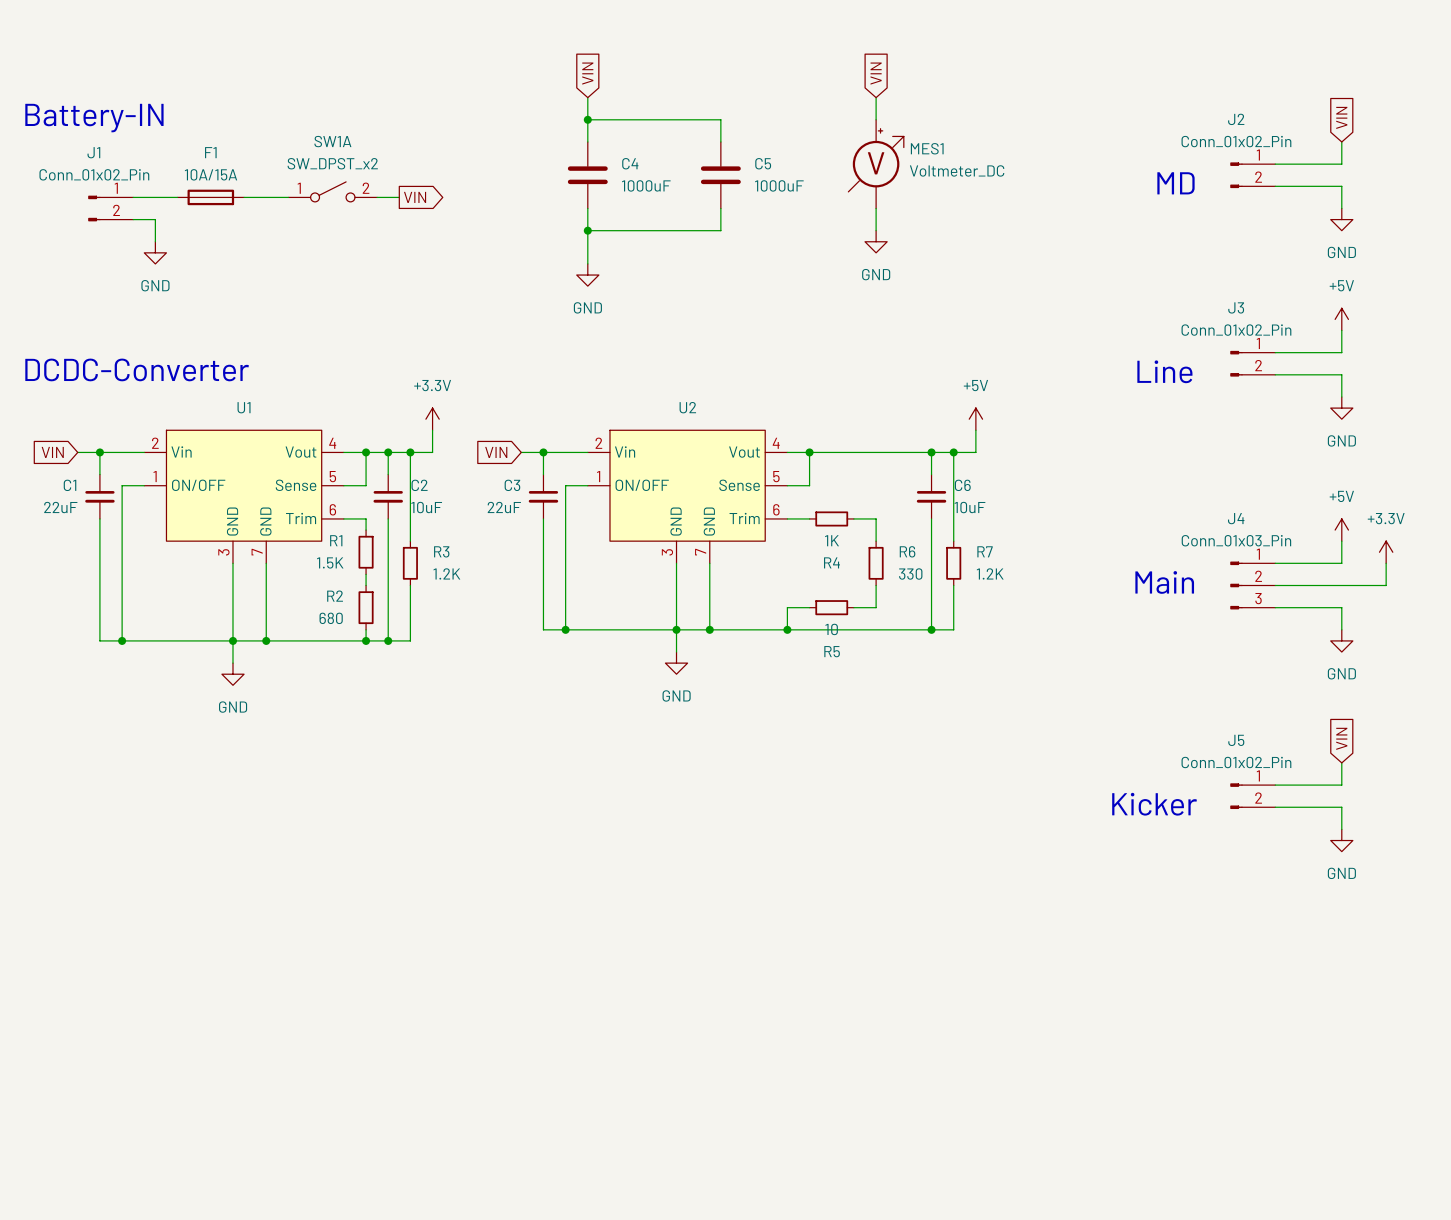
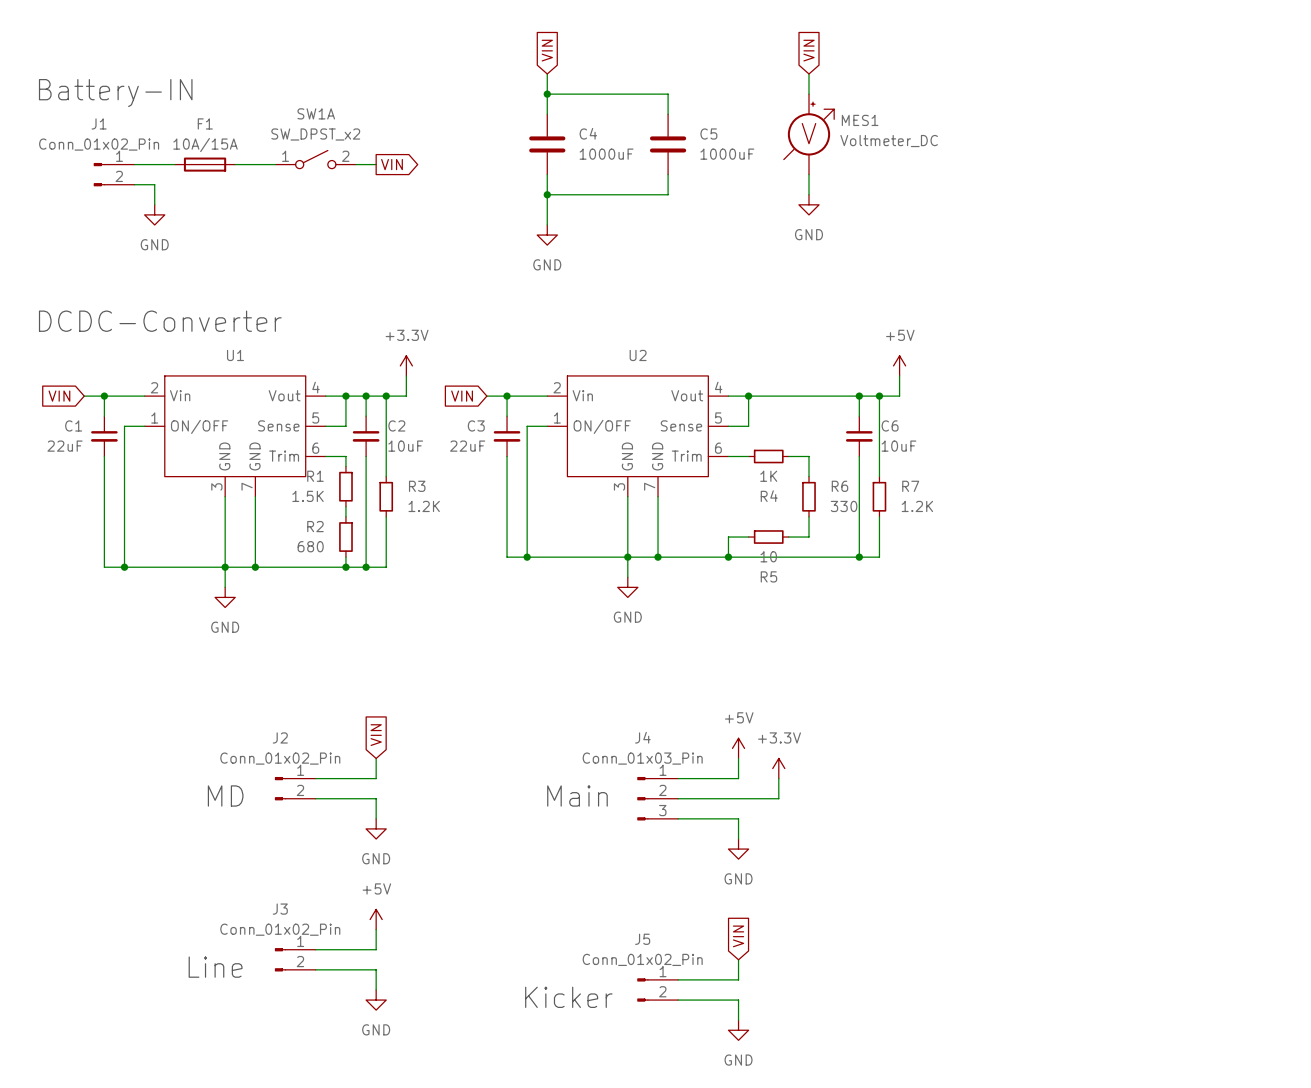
global label: VIN (1341, 117) -> none
wire: (1341, 141) (1341, 164) (1275, 164) -> none
J2 position: (1252, 175) -> (295, 788)
text: MD (1175, 183) -> none
wire: (1275, 186) (1341, 186) (1341, 208) -> none
power symbol: GND (1341, 219) -> none
power symbol: +5V (1341, 319) -> none
wire: (1341, 330) (1341, 352) (1275, 352) -> none
J3 position: (1252, 363) -> (295, 959)
text: Line (1164, 371) -> none
wire: (1275, 374) (1341, 374) (1341, 397) -> none
power symbol: GND (1341, 408) -> none
power symbol: +5V (1341, 530) -> none
wire: (1341, 541) (1341, 563) (1275, 563) -> none
power symbol: +3.3V (1386, 552) -> none
wire: (1386, 563) (1386, 585) (1275, 585) -> none
text: Main (1164, 582) -> none
J4 position: (1252, 585) -> (657, 798)
wire: (1275, 607) (1341, 607) (1341, 629) -> none
power symbol: GND (1341, 640) -> none
global label: VIN (1341, 738) -> none
wire: (1341, 762) (1341, 785) (1275, 785) -> none
J5 position: (1252, 796) -> (657, 989)
text: Kicker (1154, 804) -> none
wire: (1275, 807) (1341, 807) (1341, 829) -> none
global label: none -> VIN (376, 735)
power symbol: none -> +5V (738, 748)
power symbol: GND (1341, 840) -> none
wire: none -> (376, 758) (376, 778) (315, 778)
wire: none -> (738, 758) (738, 778) (678, 778)
power symbol: none -> +3.3V (778, 768)
wire: none -> (778, 778) (778, 798) (678, 798)
text: none -> MD (225, 796)
text: none -> Main (577, 796)
wire: none -> (315, 798) (376, 798) (376, 818)
wire: none -> (678, 818) (738, 818) (738, 839)
power symbol: none -> GND (376, 828)
power symbol: none -> GND (738, 849)
power symbol: none -> +5V (376, 919)
wire: none -> (376, 929) (376, 949) (315, 949)
global label: none -> VIN (738, 936)
wire: none -> (738, 959) (738, 979) (678, 979)
text: none -> Line (215, 967)
wire: none -> (315, 969) (376, 969) (376, 989)
text: none -> Kicker (568, 997)
power symbol: none -> GND (376, 1000)
wire: none -> (678, 1000) (738, 1000) (738, 1020)
power symbol: none -> GND (738, 1030)

